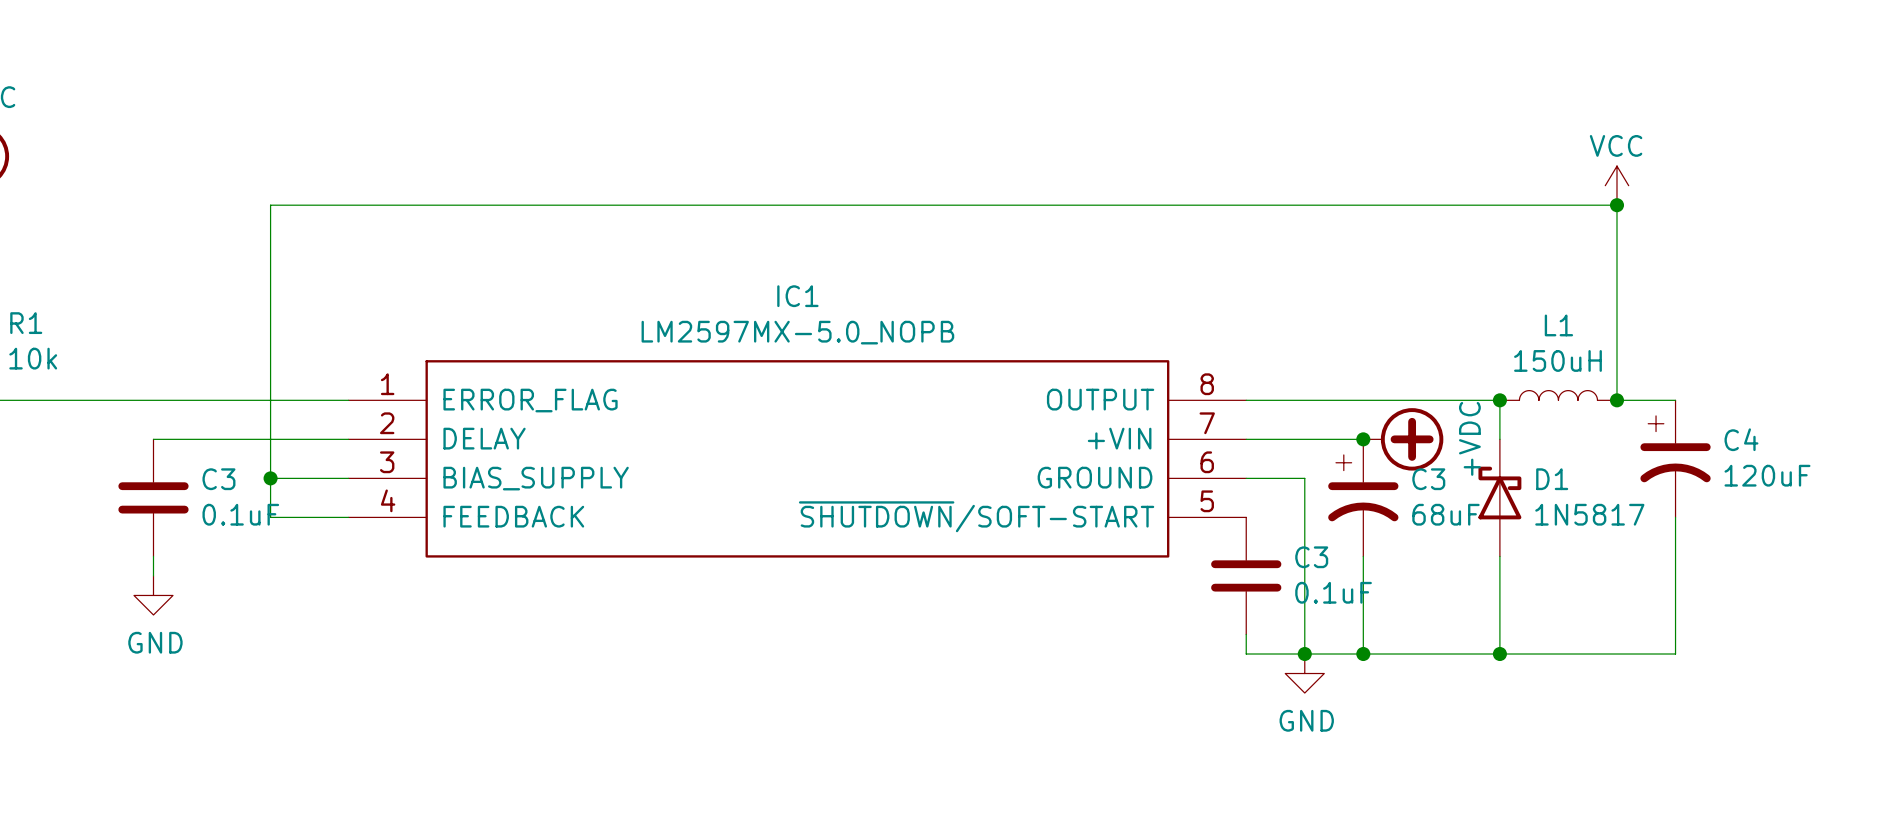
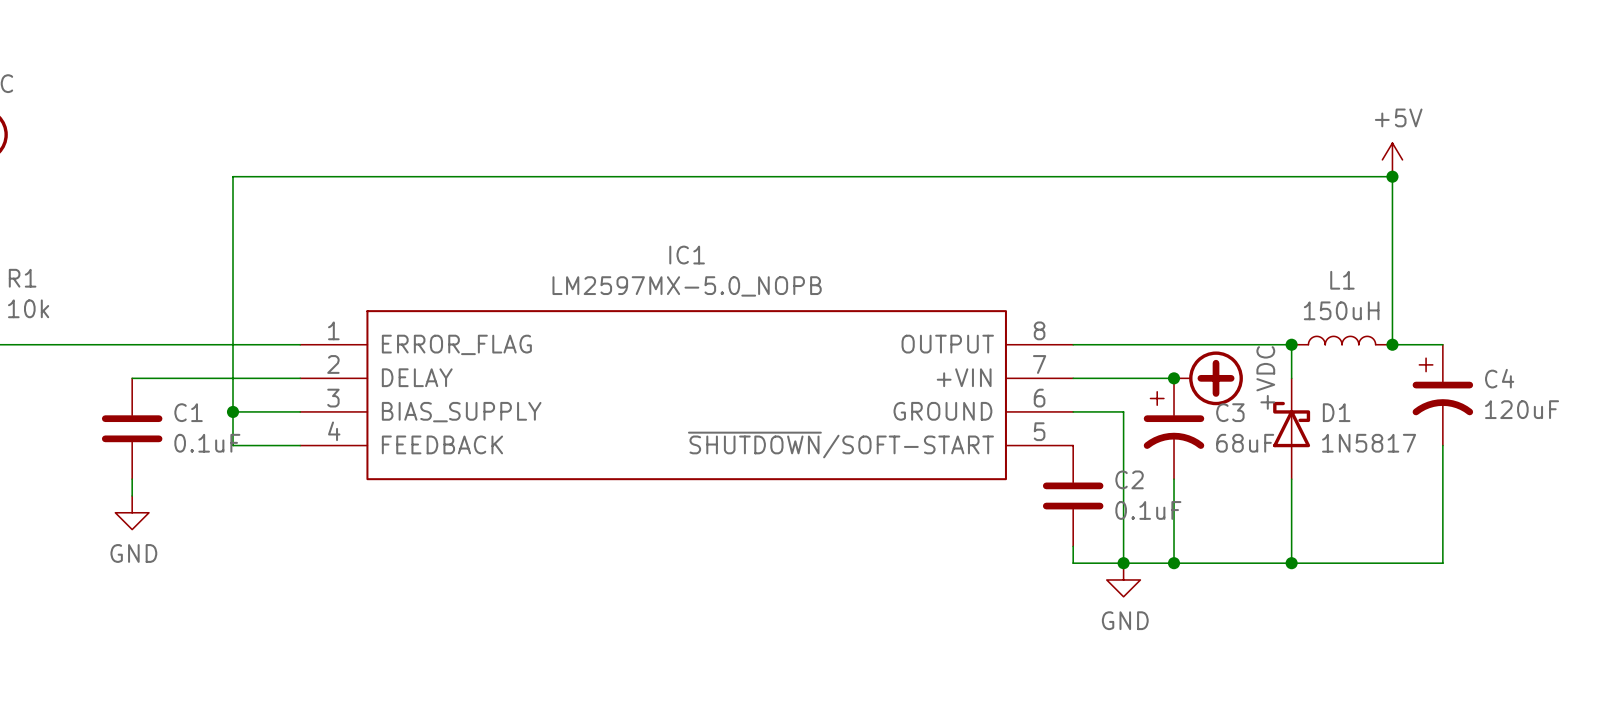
power symbol: VCC (1616, 185) -> +5V (1392, 159)
C3 name: C3 (218, 479) -> C1 (188, 412)
C3 name: C3 (1311, 557) -> C2 (1129, 479)

